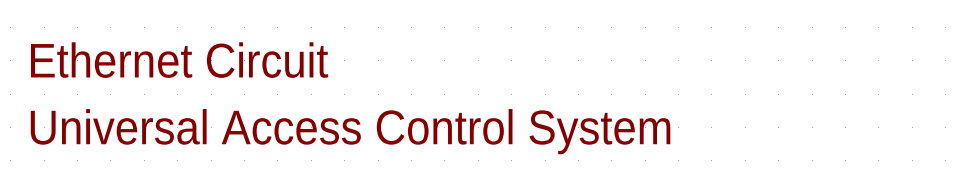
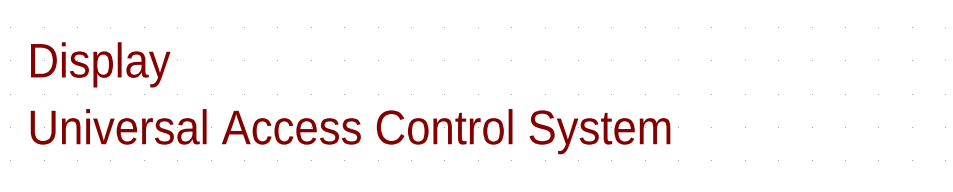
text: Ethernet Circuit (179, 60) -> Display (100, 64)

